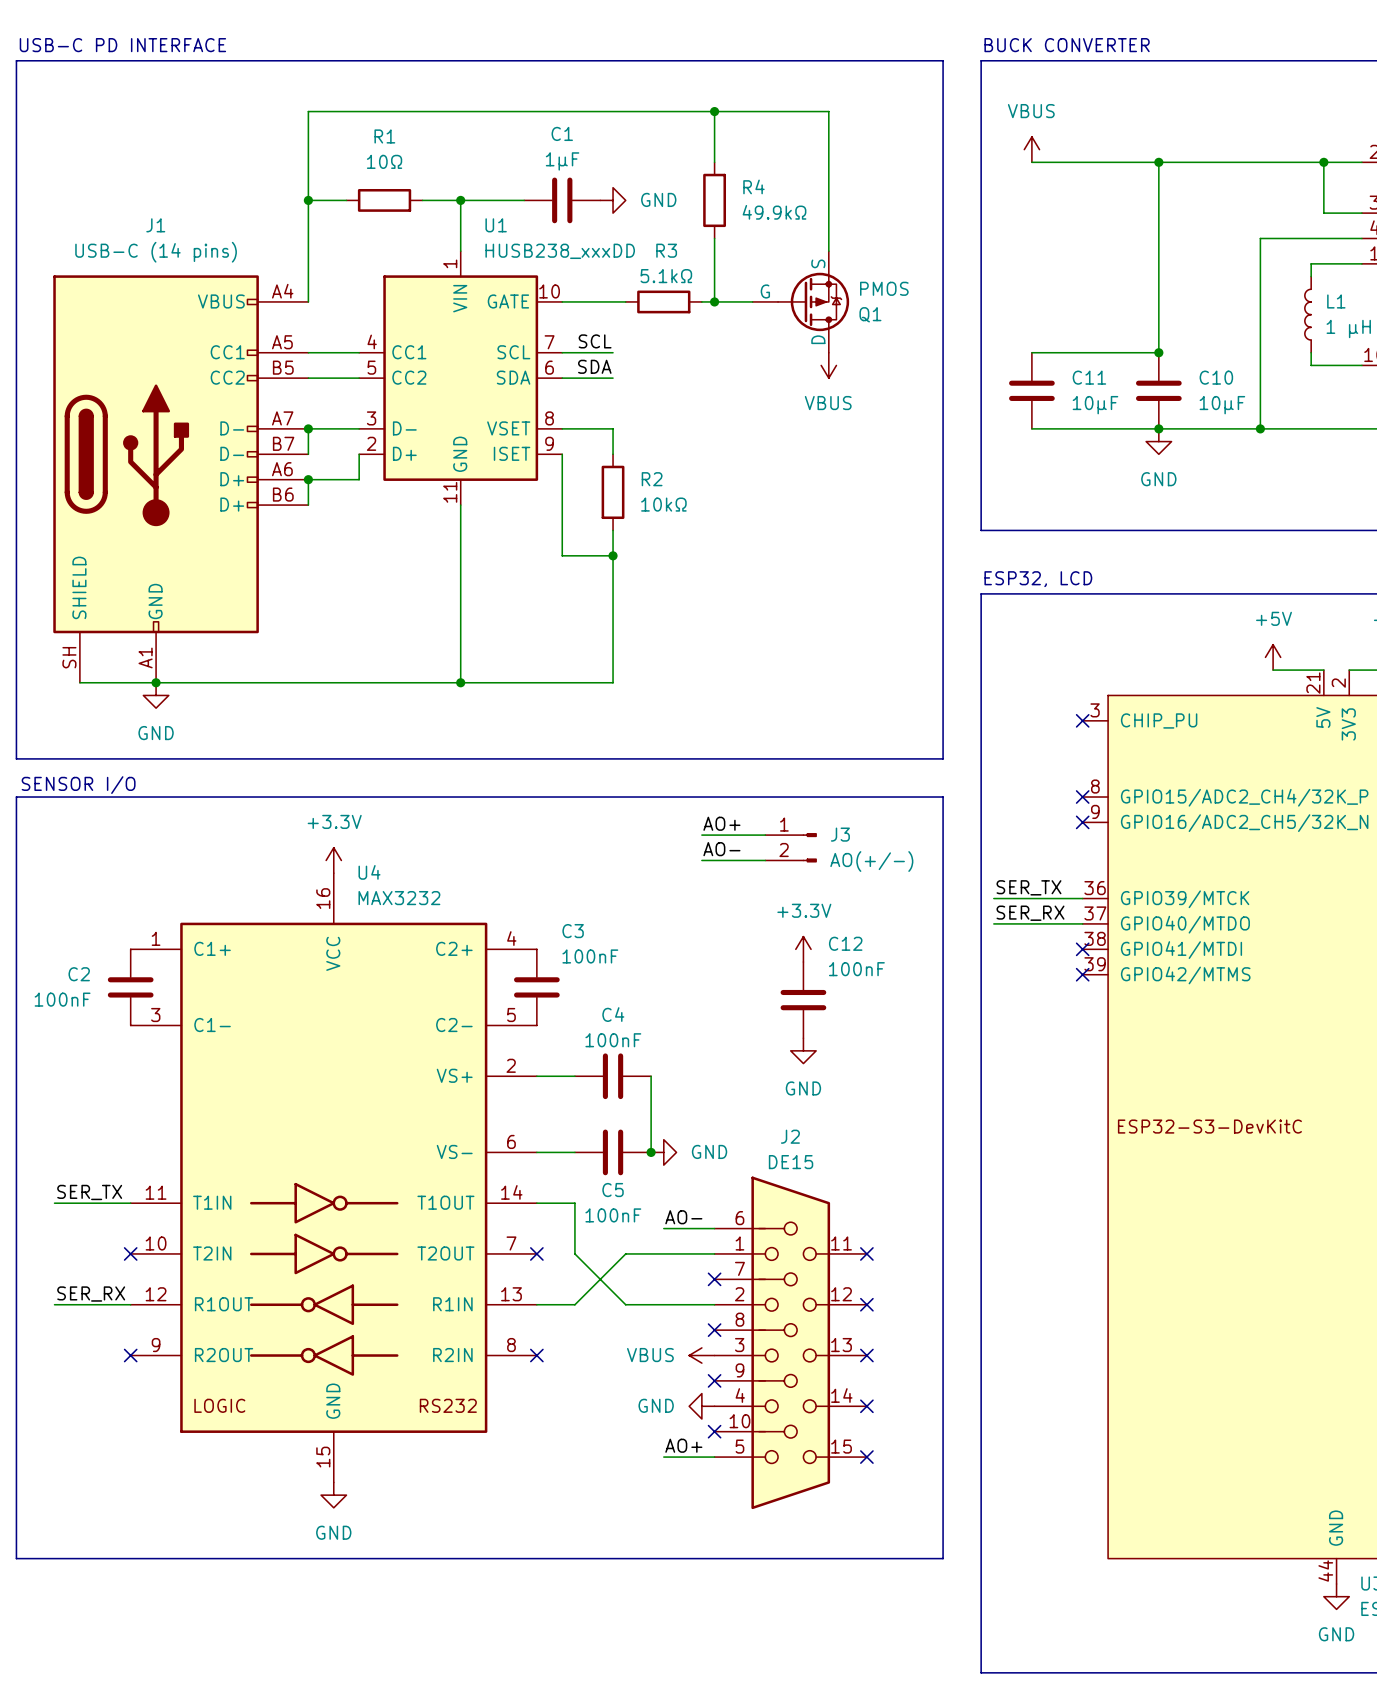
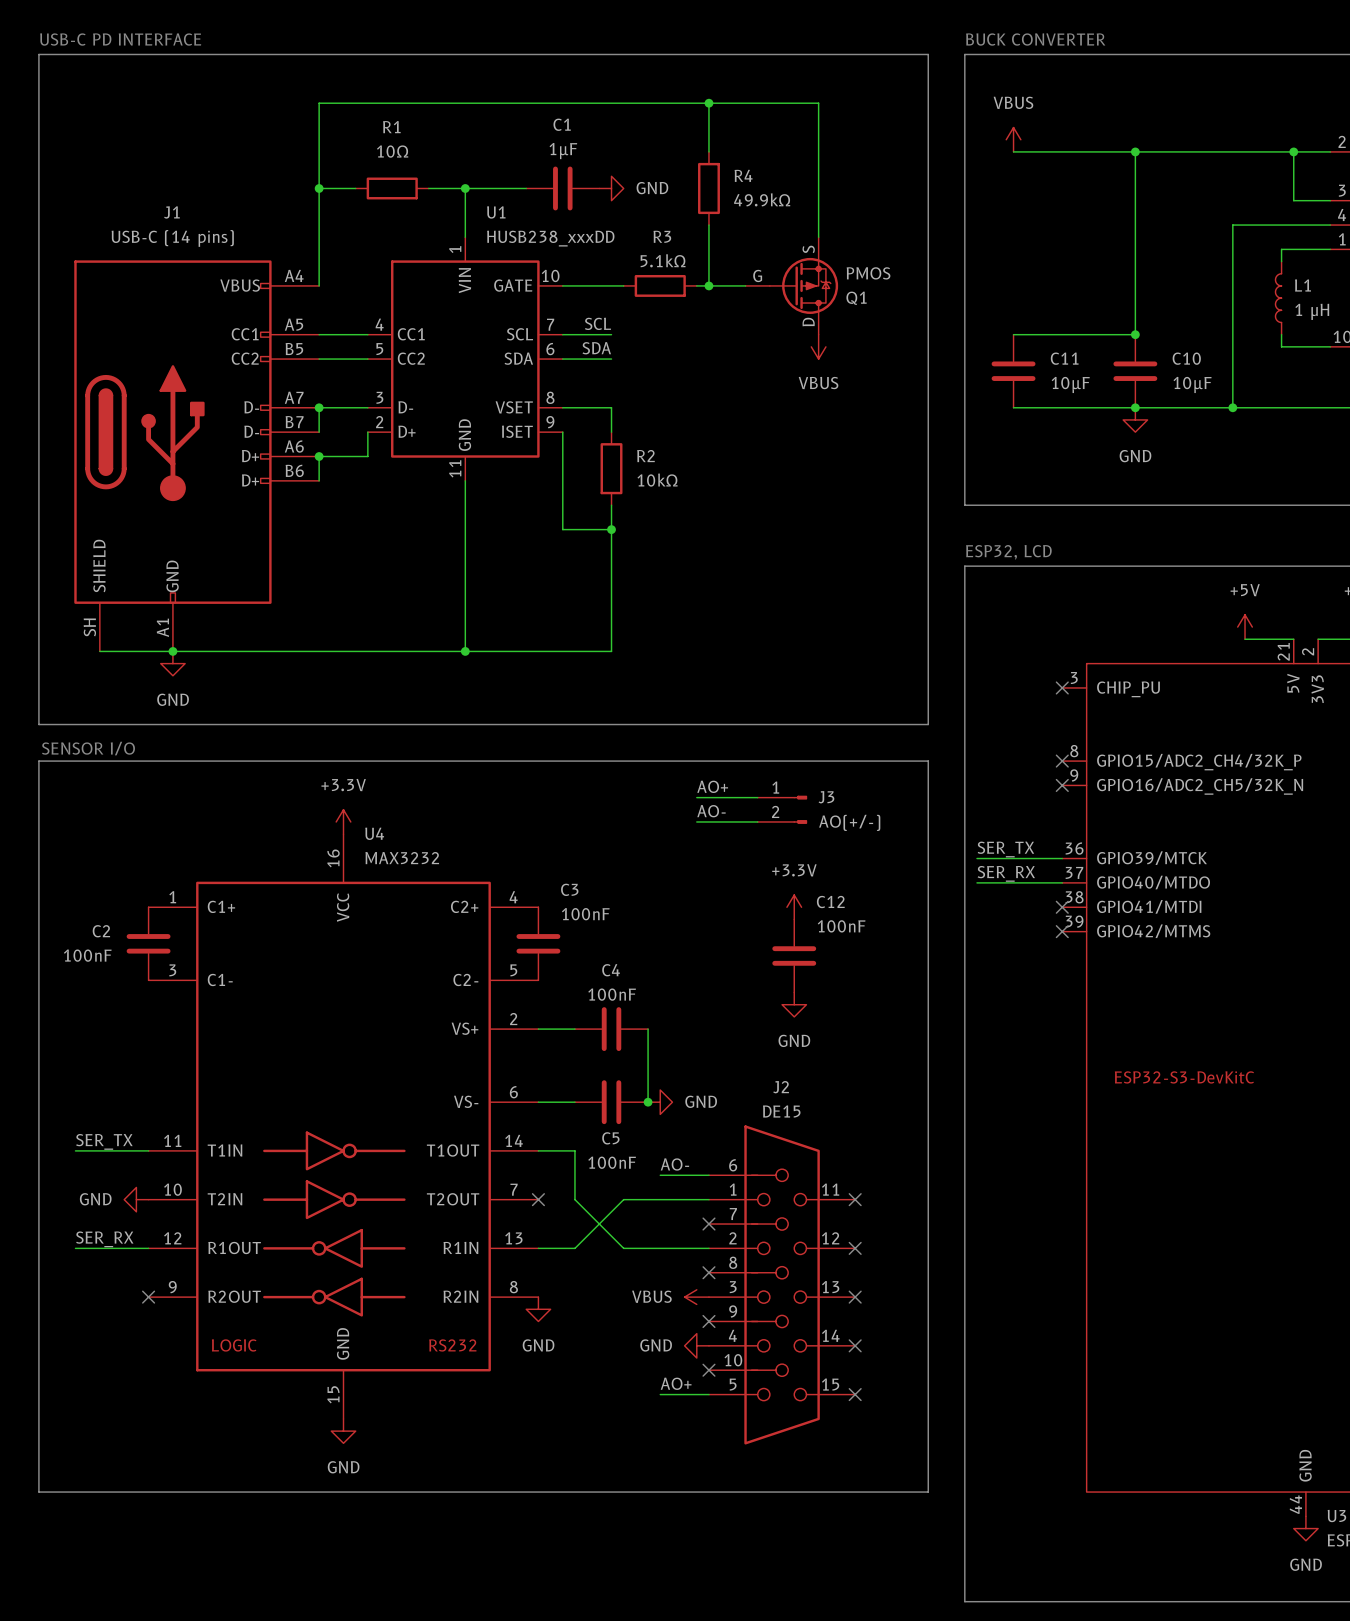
power symbol: none -> GND (136, 1199)
no-connect mark: (130, 1253) -> none
no-connect mark: (536, 1355) -> none
power symbol: none -> GND (538, 1309)

